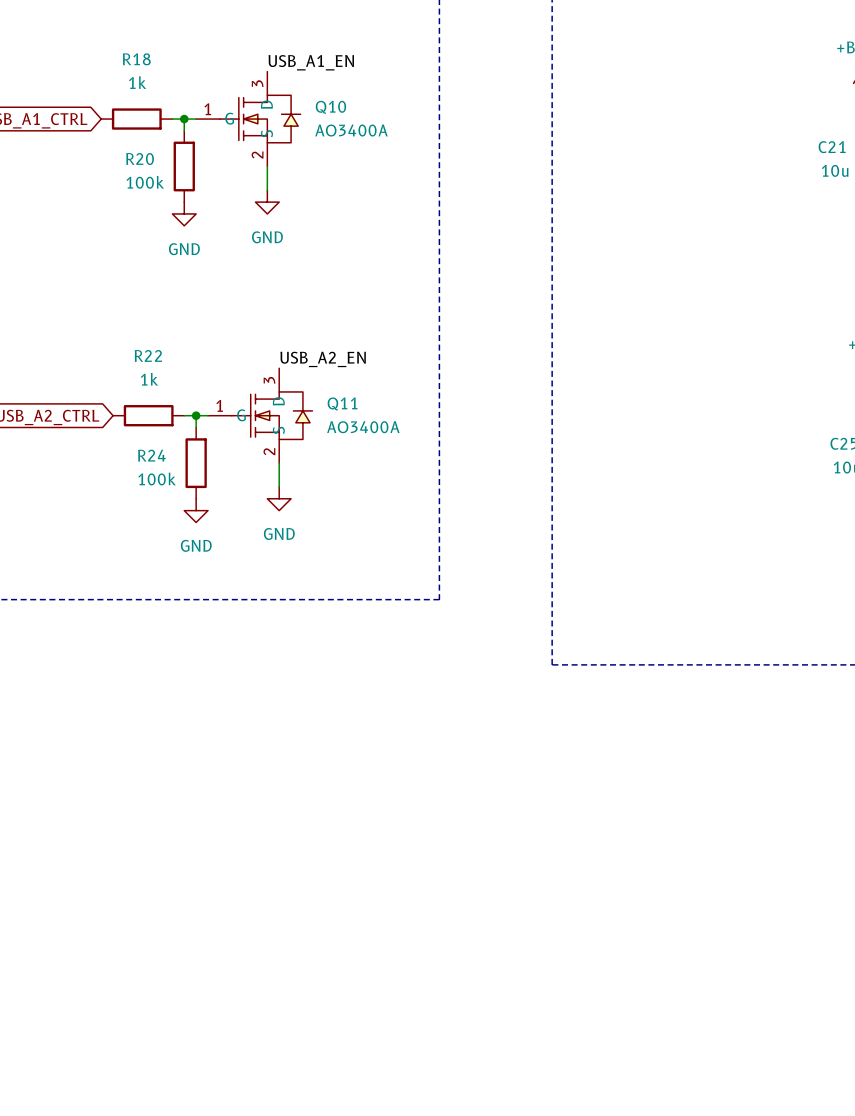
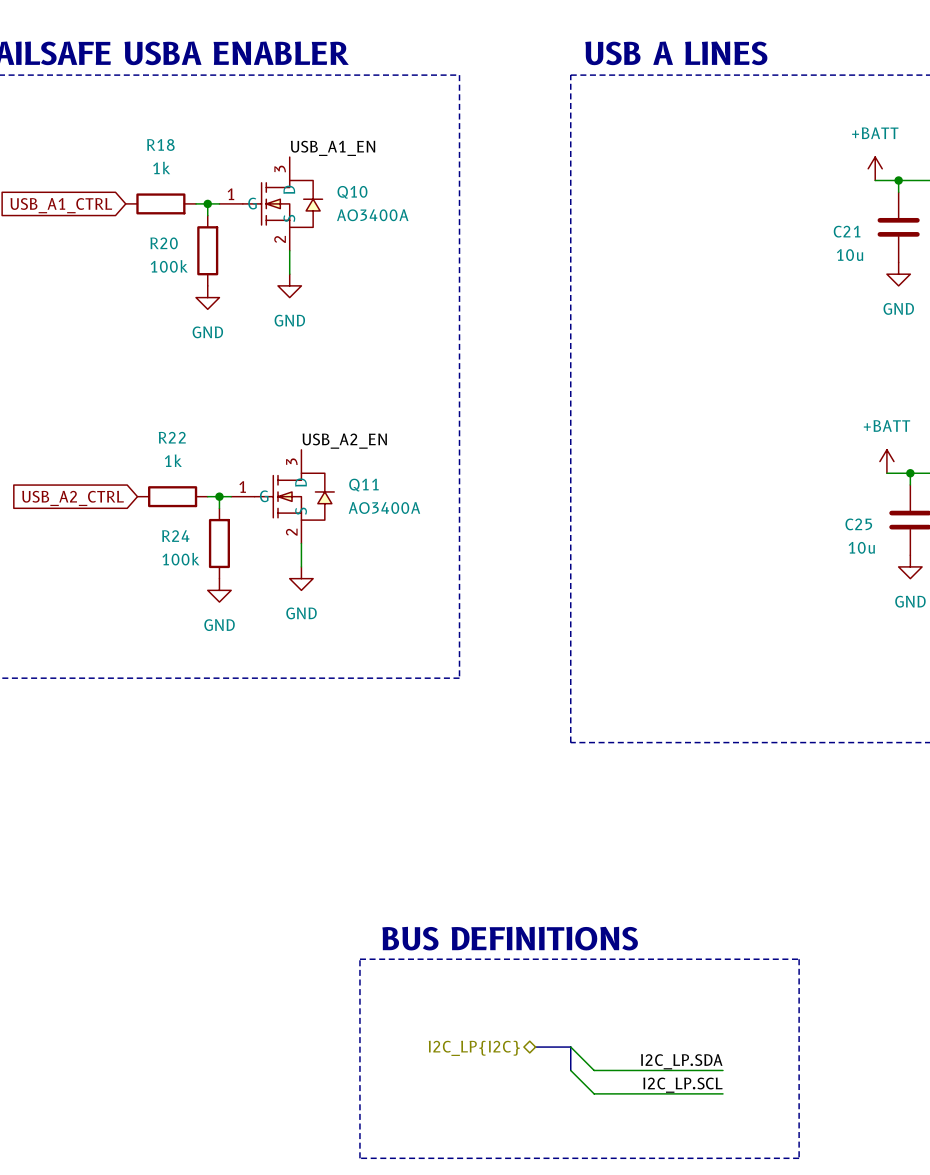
text: none -> BUS DEFINITIONS (510, 938)
line: none -> (359, 959) (799, 959) (799, 1158) (359, 1158) (359, 959)
bus: none -> (535, 1047) (570, 1047) (570, 1070)
wire: none -> (570, 1047) (594, 1070) (722, 1070)
hierarchical label: none -> I2C_LP{I2C} (474, 1048)
label: none -> I2C_LP.SDA (681, 1061)
wire: none -> (570, 1070) (594, 1093) (722, 1093)
label: none -> I2C_LP.SCL (682, 1085)

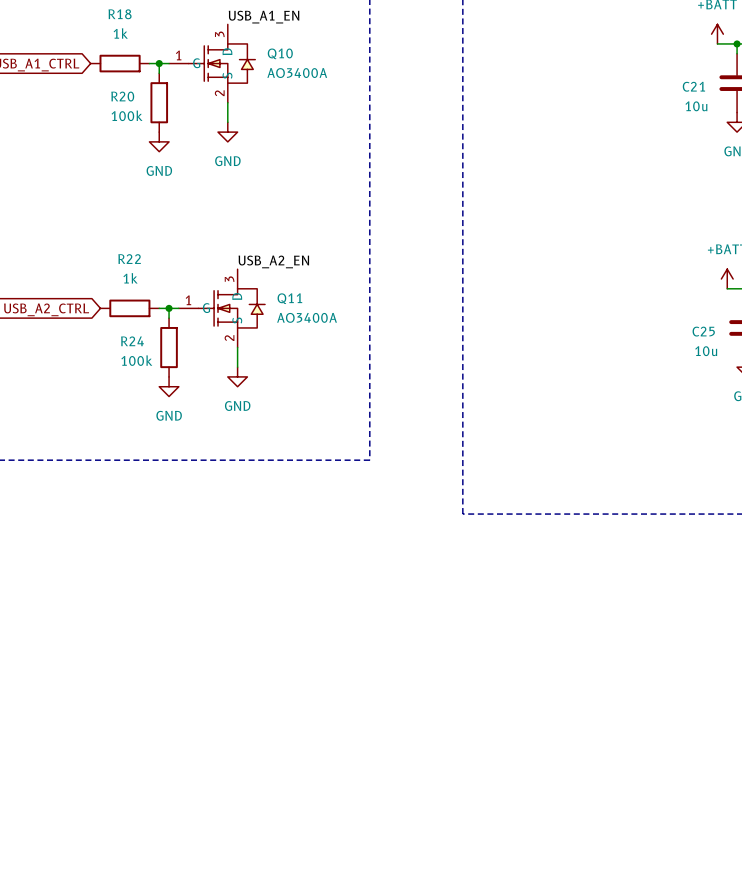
text: BUS DEFINITIONS (510, 938) -> none
line: (359, 959) (799, 959) (799, 1158) (359, 1158) (359, 959) -> none
bus: (535, 1047) (570, 1047) (570, 1070) -> none
wire: (570, 1047) (594, 1070) (722, 1070) -> none
hierarchical label: I2C_LP{I2C} (474, 1048) -> none
label: I2C_LP.SDA (681, 1061) -> none
wire: (570, 1070) (594, 1093) (722, 1093) -> none
label: I2C_LP.SCL (682, 1085) -> none

